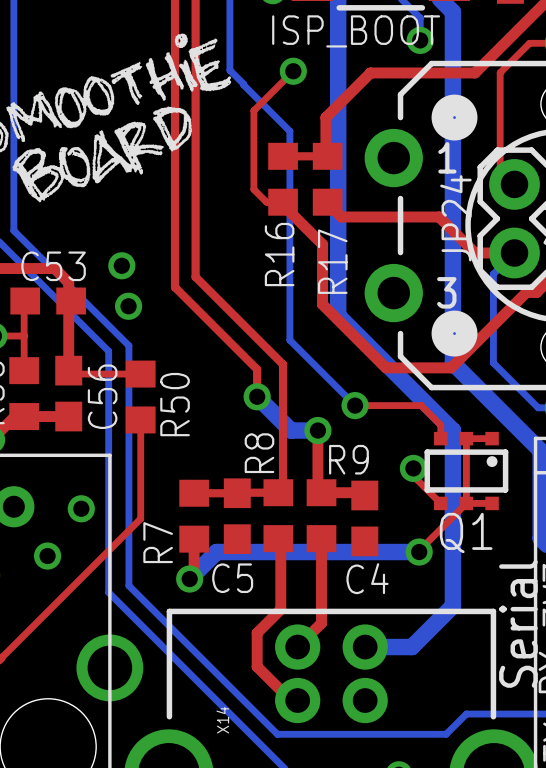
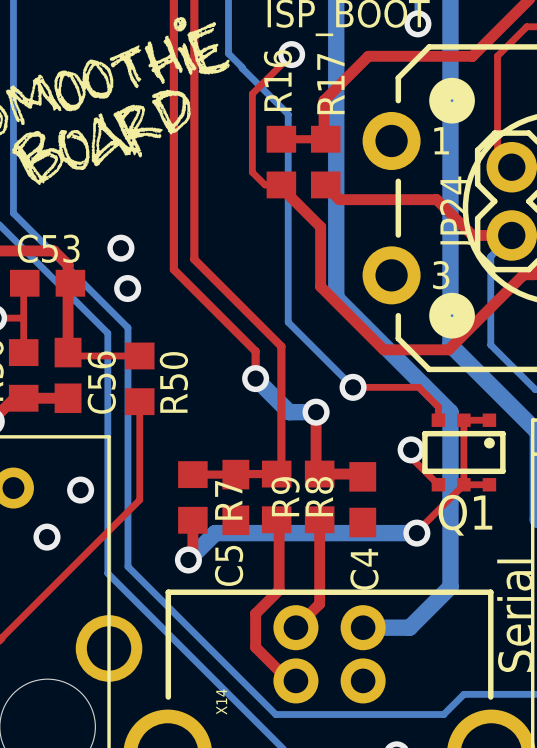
R16 name position: R16 (279, 254) -> R16 (278, 80)
R17 name position: R17 (332, 261) -> R17 (330, 84)
R8 name position: R8 (259, 453) -> R8 (319, 496)
R9 name rotation: 0° (348, 459) -> 90° counterclockwise (285, 496)
R9 name position: R9 (348, 459) -> R9 (285, 496)
R7 name position: R7 (158, 542) -> R7 (228, 500)
C5 name rotation: 0° (232, 578) -> 90° counterclockwise (229, 565)
C4 name rotation: 0° (367, 578) -> 90° counterclockwise (364, 569)

